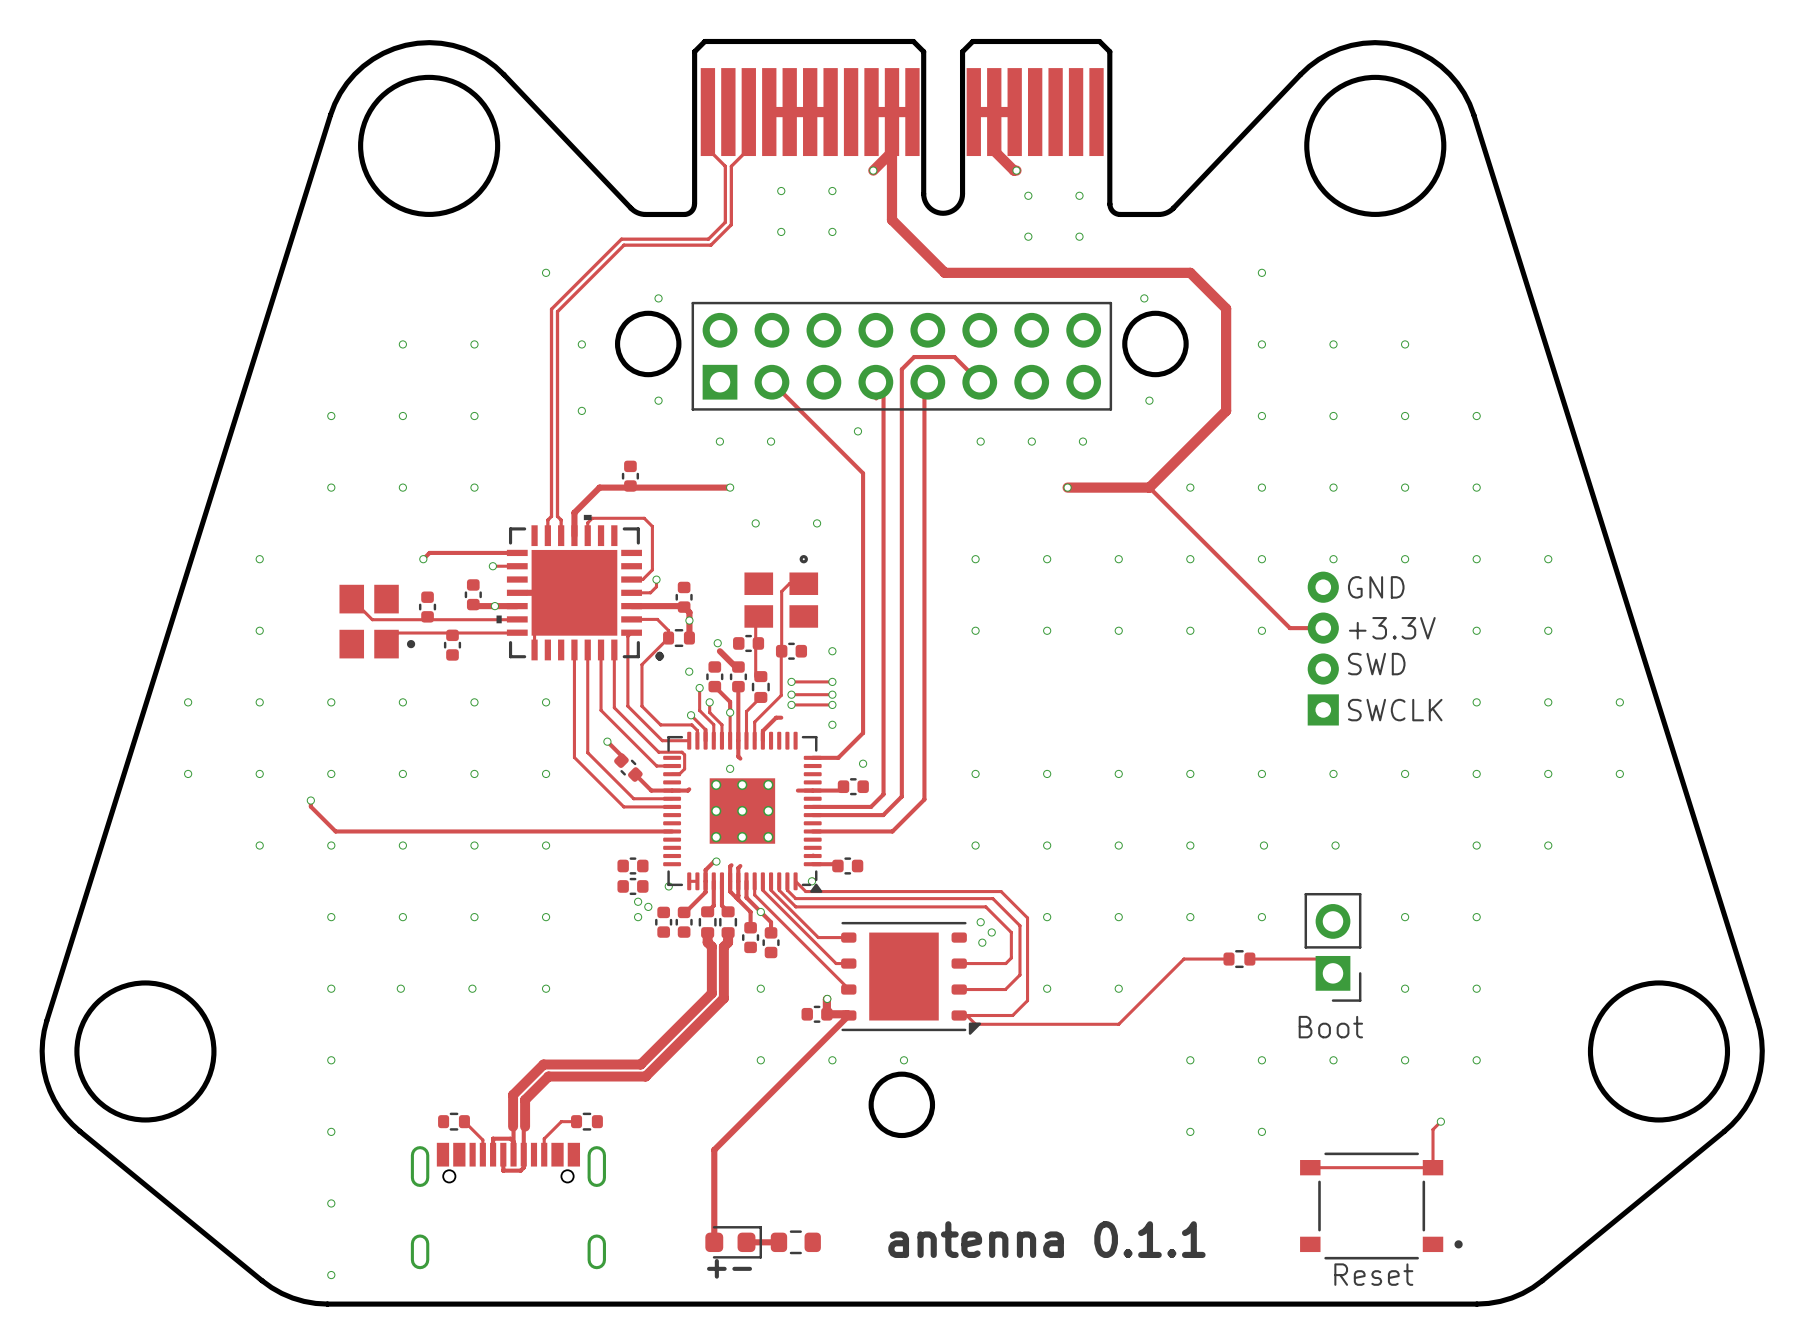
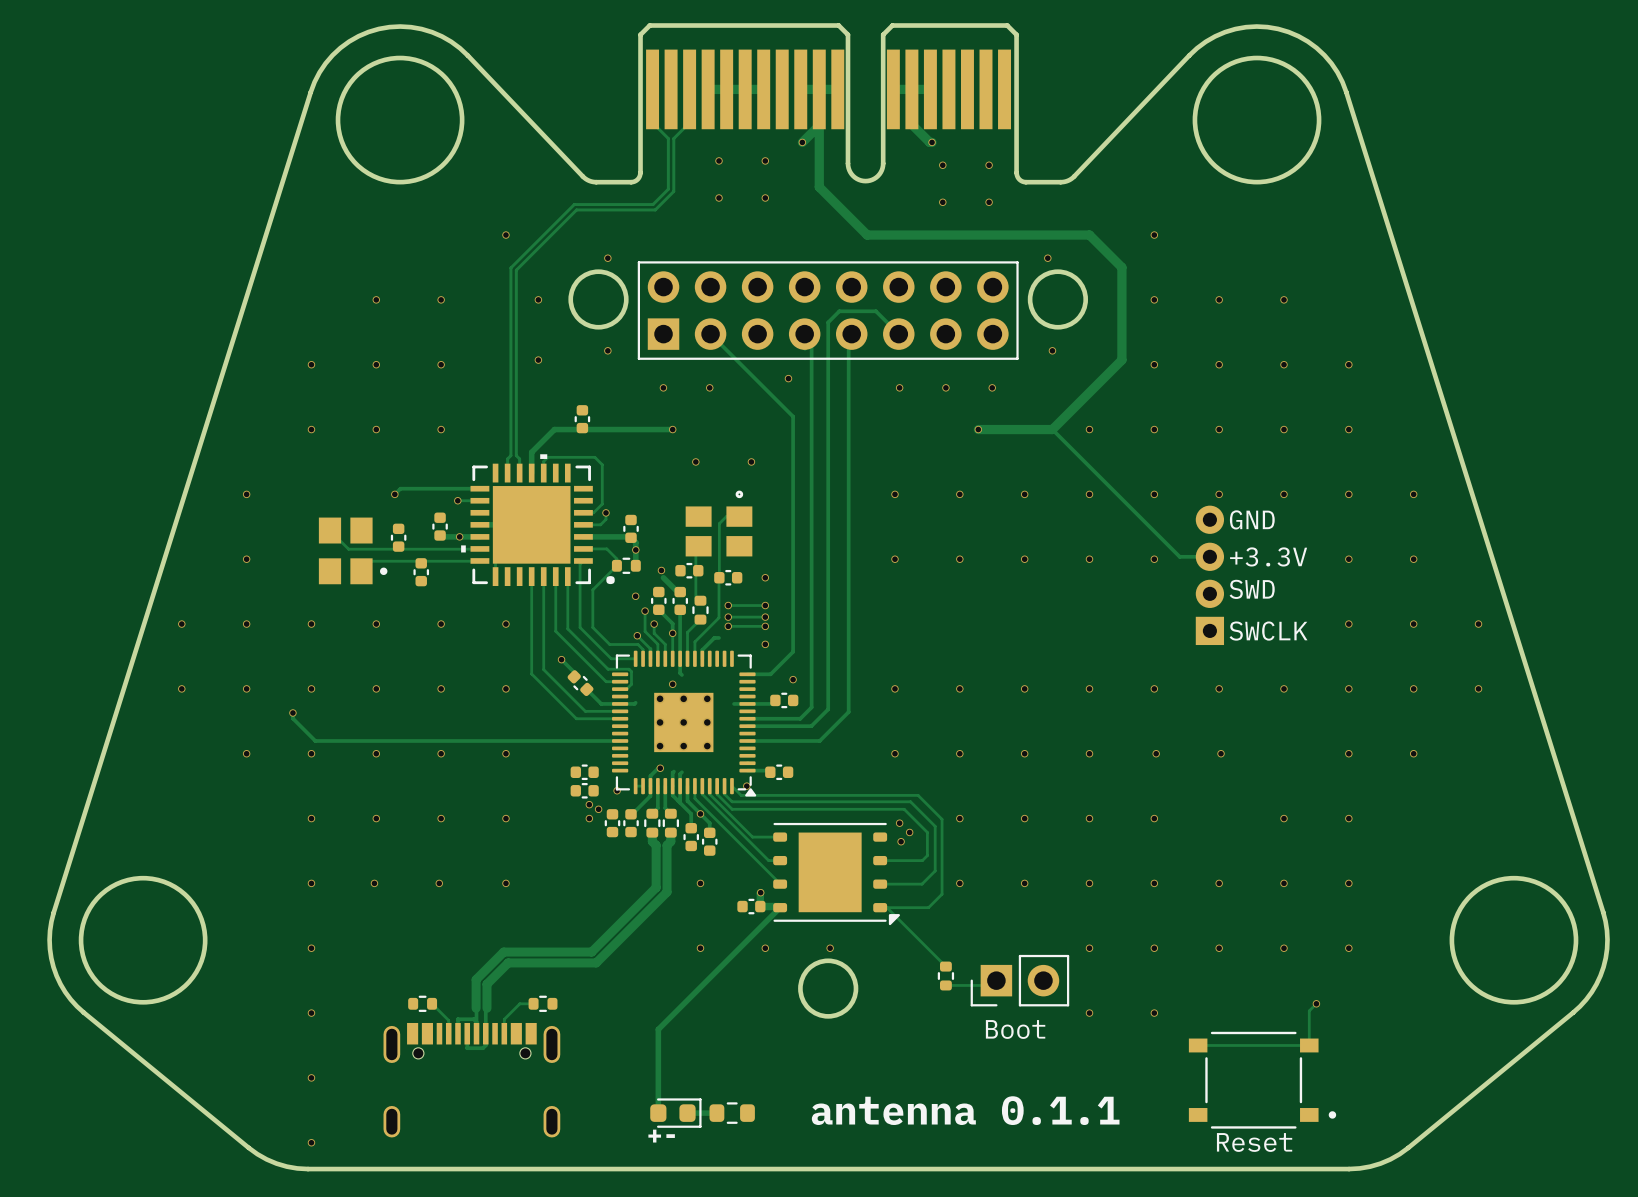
part rotation: 0° (1332, 947) -> 90° clockwise (1019, 980)
part position: (1332, 947) -> (1019, 980)
track: (1228, 959) (1183, 959) (1118, 1024) (975, 1024) -> (945, 966) (894, 915)
part rotation: 0° (1239, 959) -> 90° clockwise (945, 976)
part position: (1239, 959) -> (945, 976)
track: (1249, 959) (1318, 959) (1332, 973) -> none
via: none -> (1089, 883)
via: none -> (1154, 883)
via: none -> (1219, 883)
text position: Boot (1330, 1027) -> Boot (1015, 1029)
track: none -> (996, 980) (991, 985) (945, 985)

